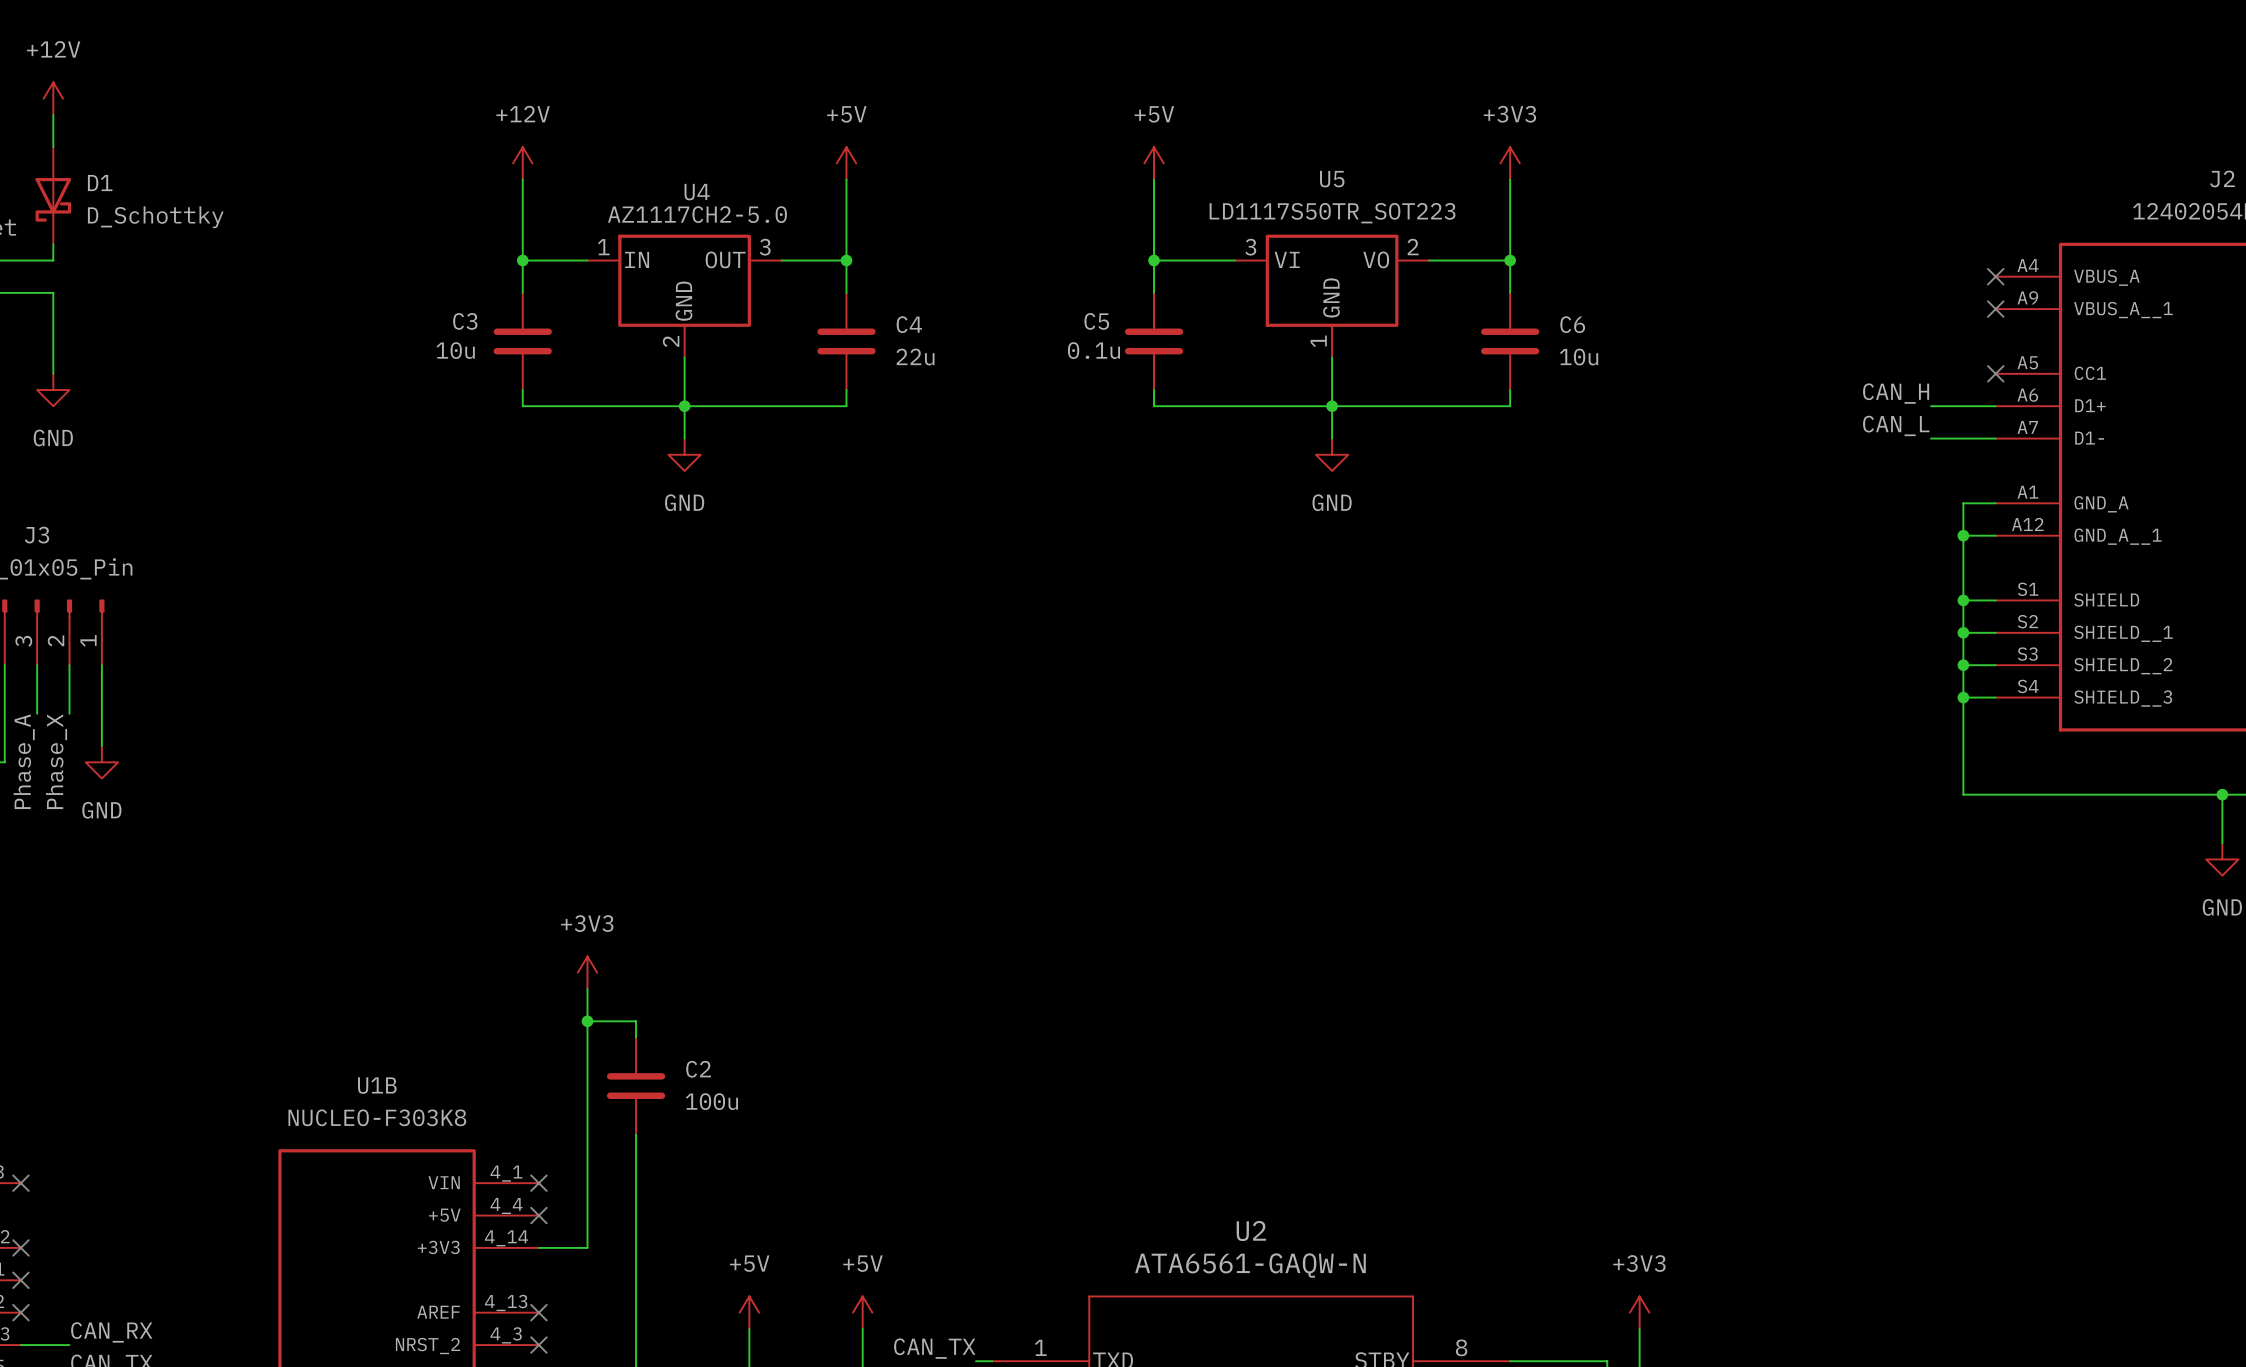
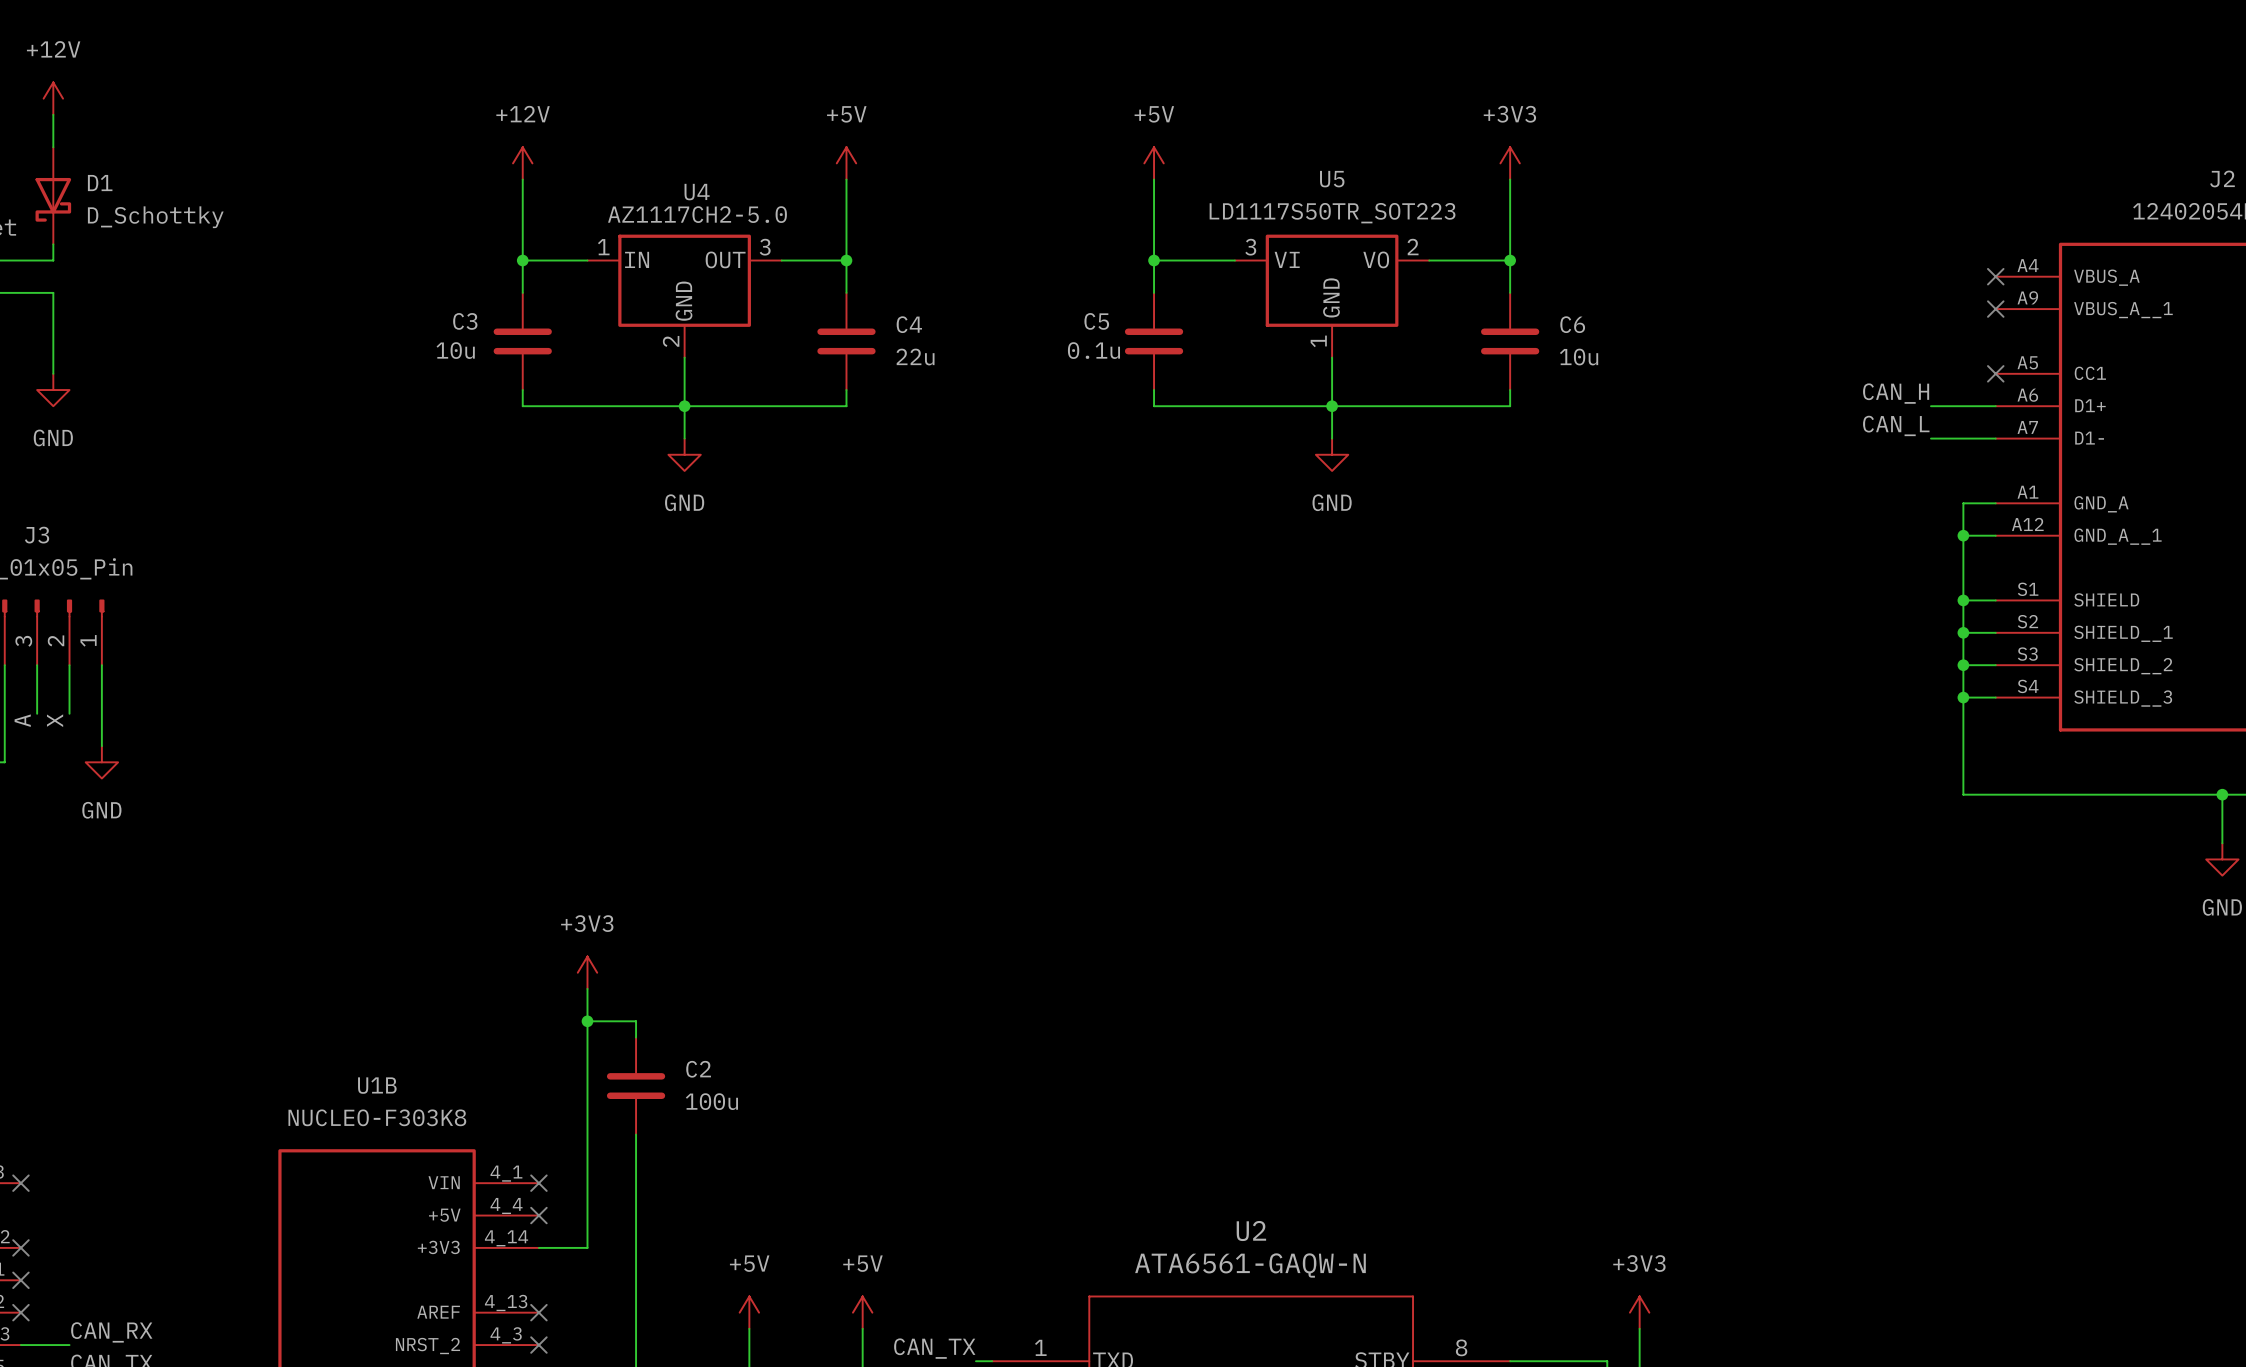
label: Phase_A (24, 761) -> A (22, 720)
label: Phase_X (56, 761) -> X (55, 720)

